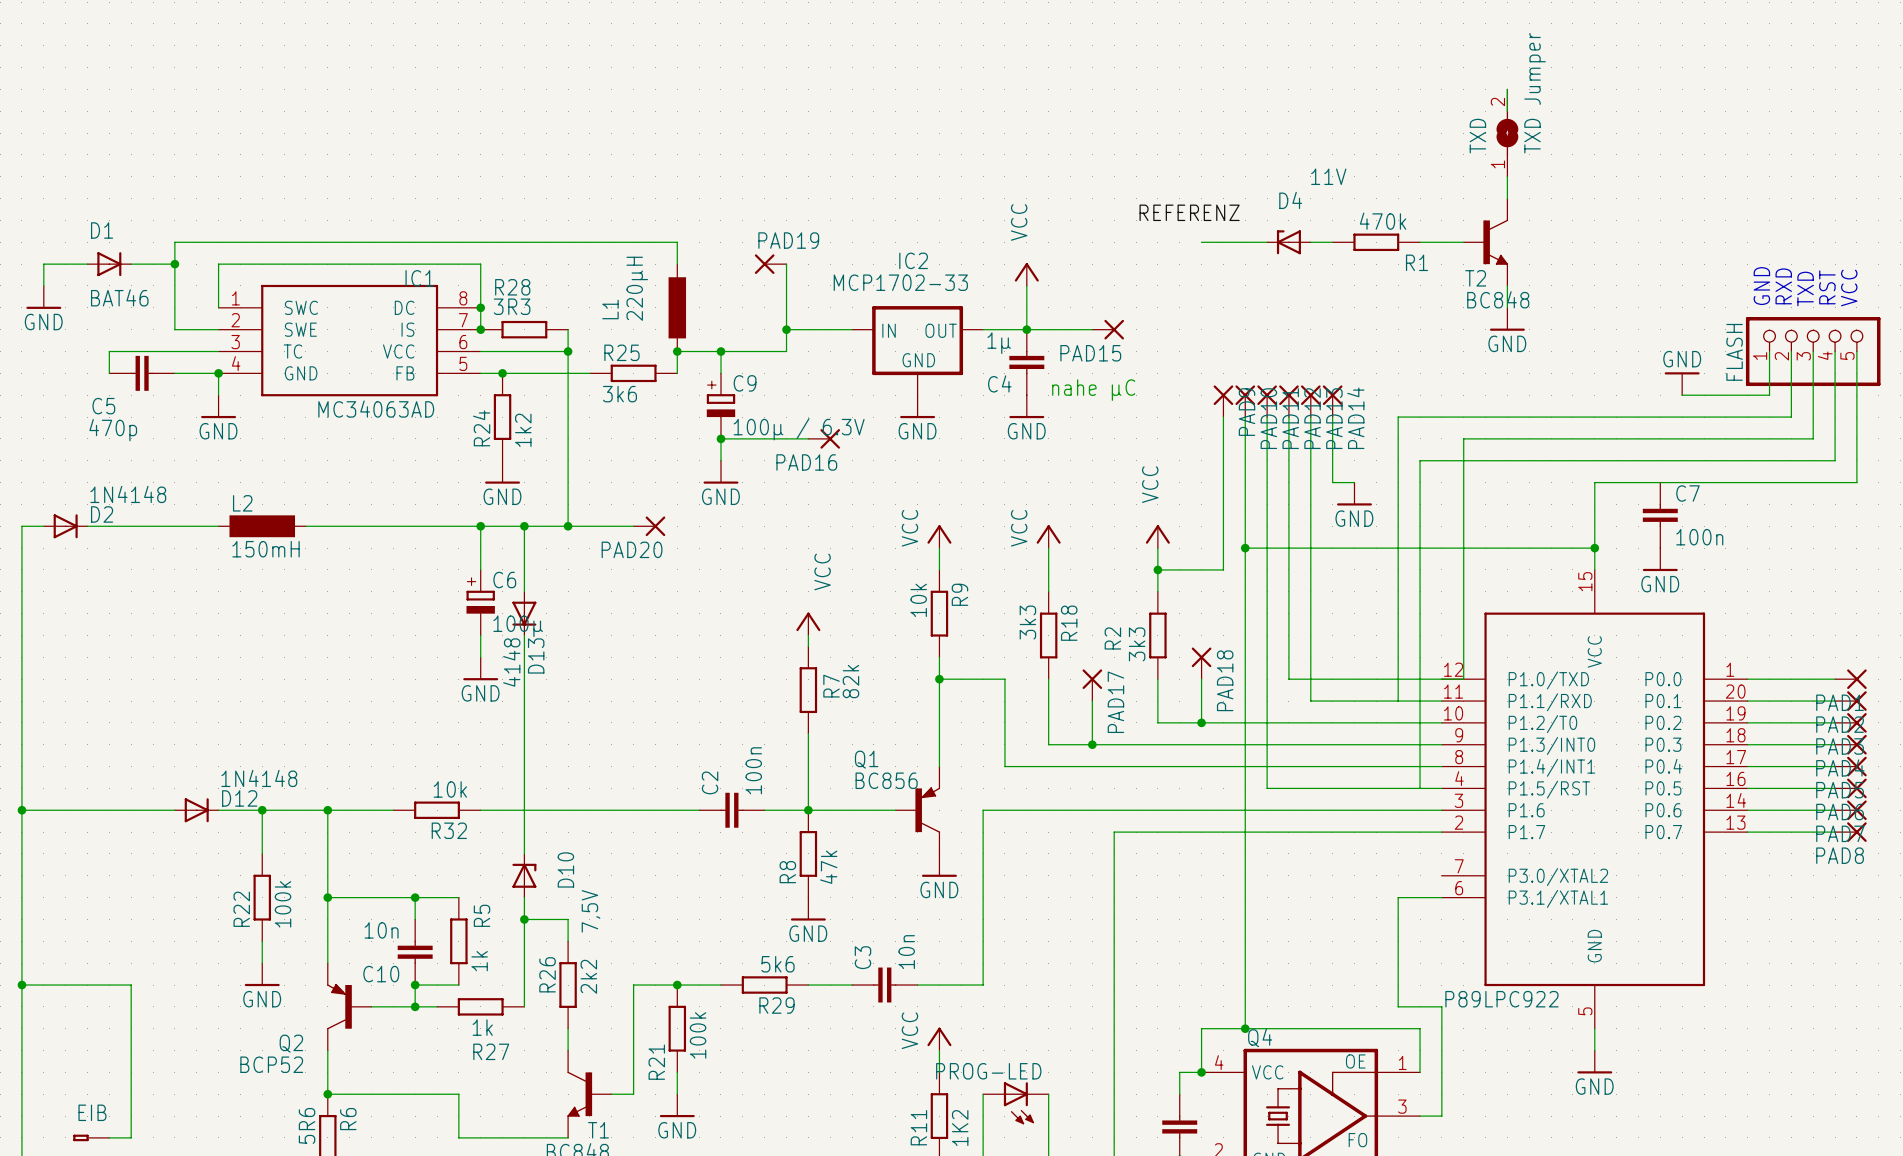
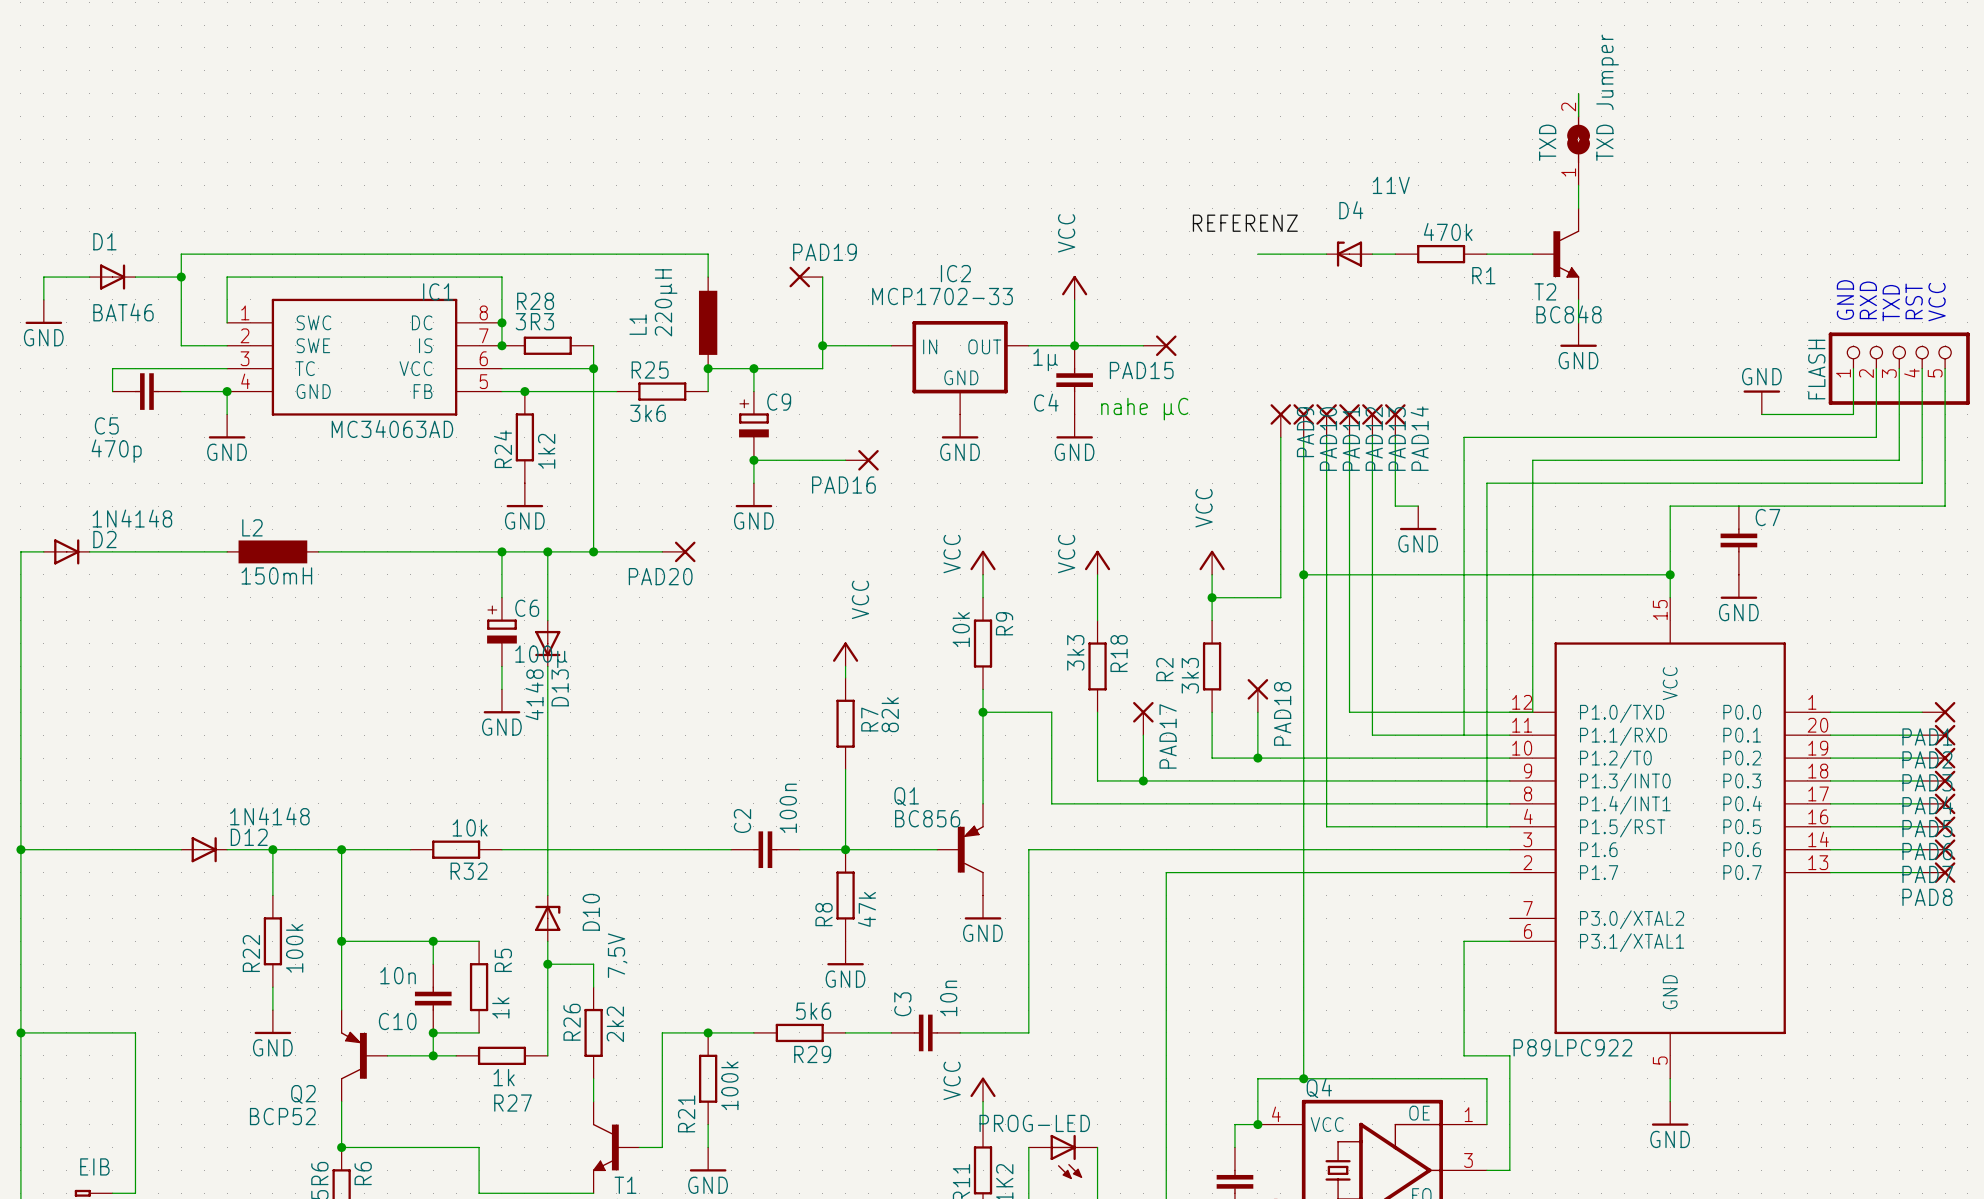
C9 value: 100µ / 6.3V (799, 429) -> none
C7 value: 100n (1699, 537) -> none

